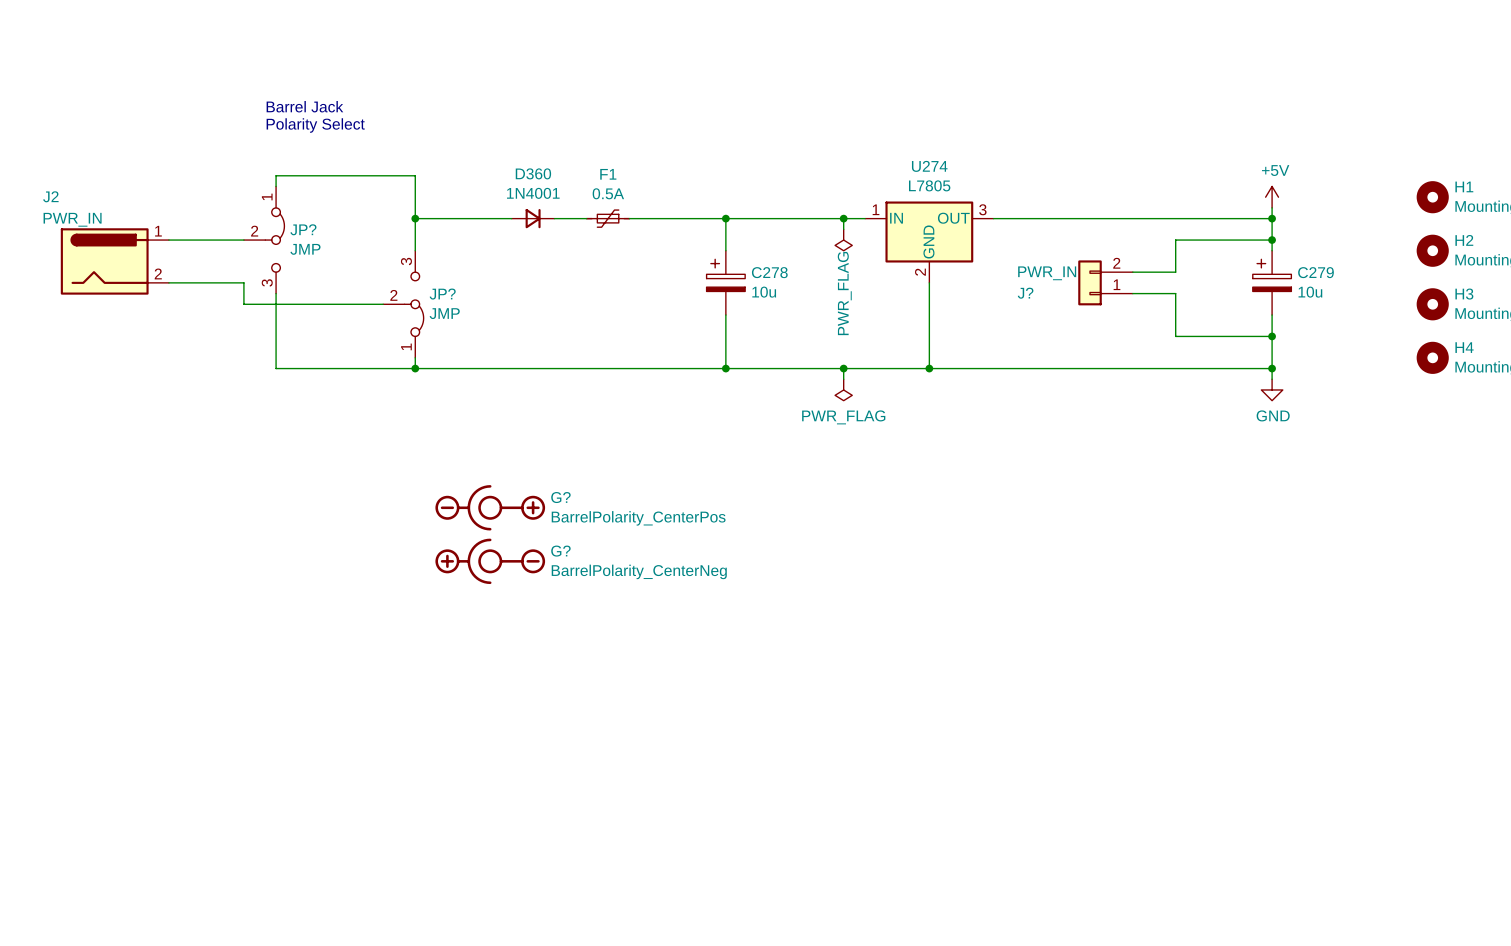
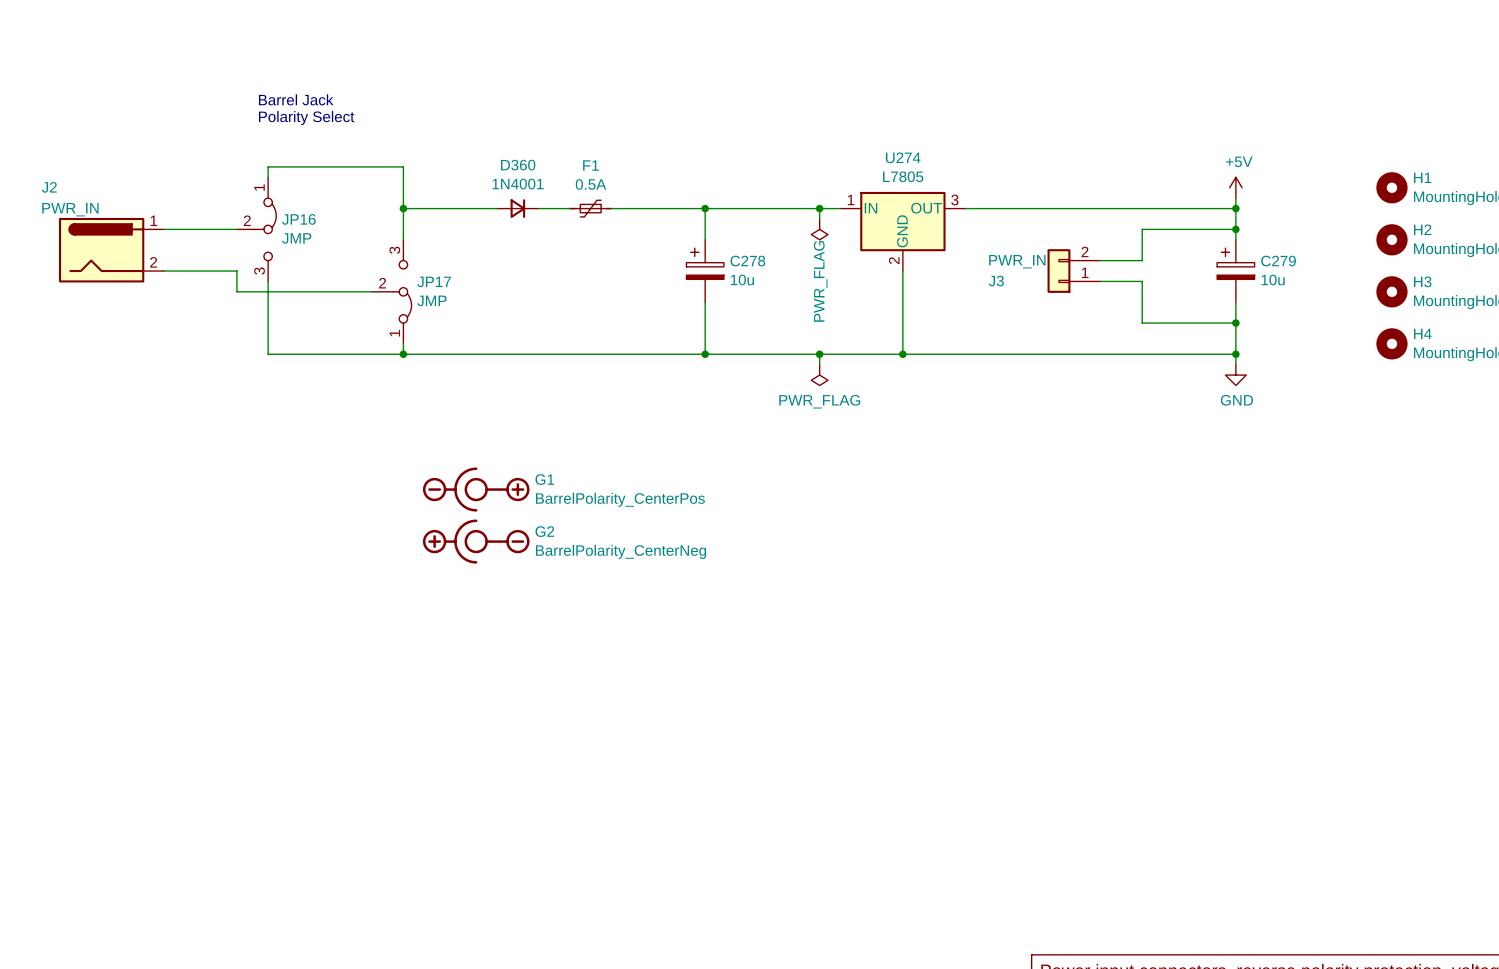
JP? name: JP? (303, 229) -> JP16 (298, 219)
J? name: J? (1025, 293) -> J3 (996, 281)
JP? name: JP? (442, 294) -> JP17 (434, 281)
G? name: G? (560, 497) -> G1 (544, 479)
G? name: G? (560, 551) -> G2 (544, 531)

